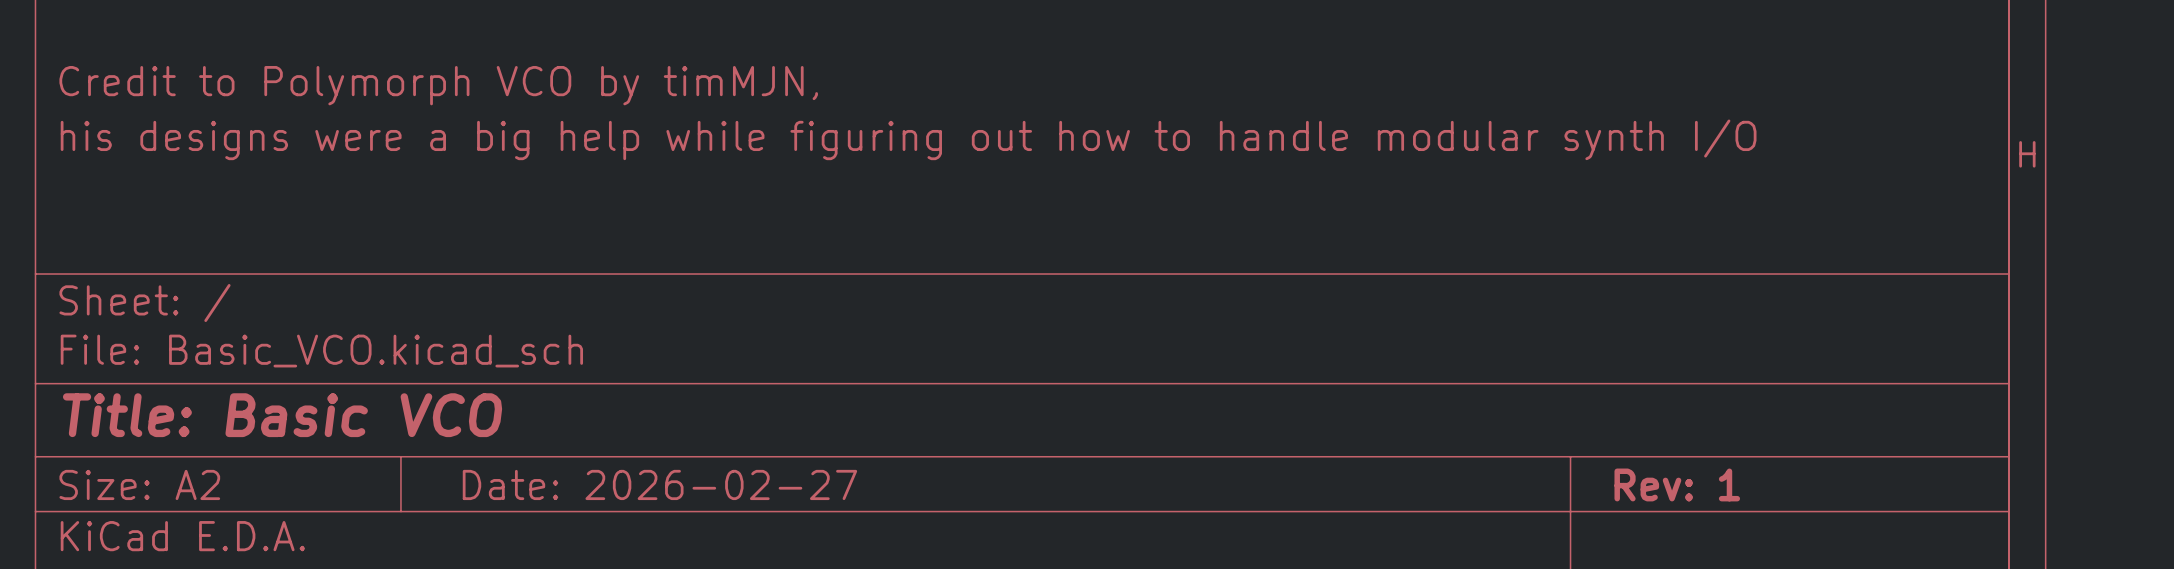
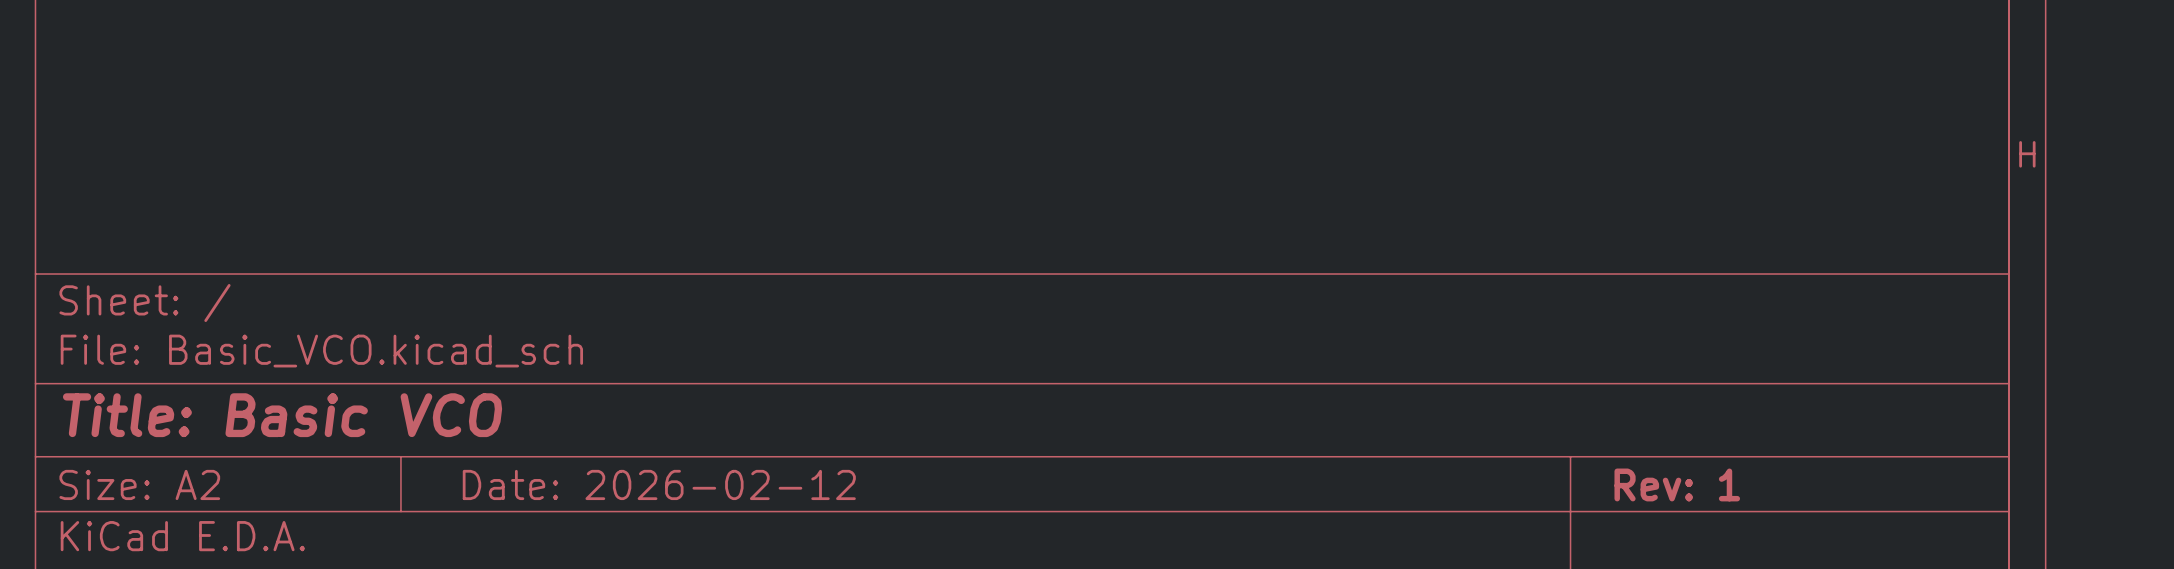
title block: Credit to Polymorph VCO by timMJN, (438, 85) -> none
title block: his designs were a big help while figuring out how to handle modular synth I/O (908, 139) -> none
title block: Date: 2026-02-27 (659, 484) -> Date: 2026-02-12 (659, 484)

